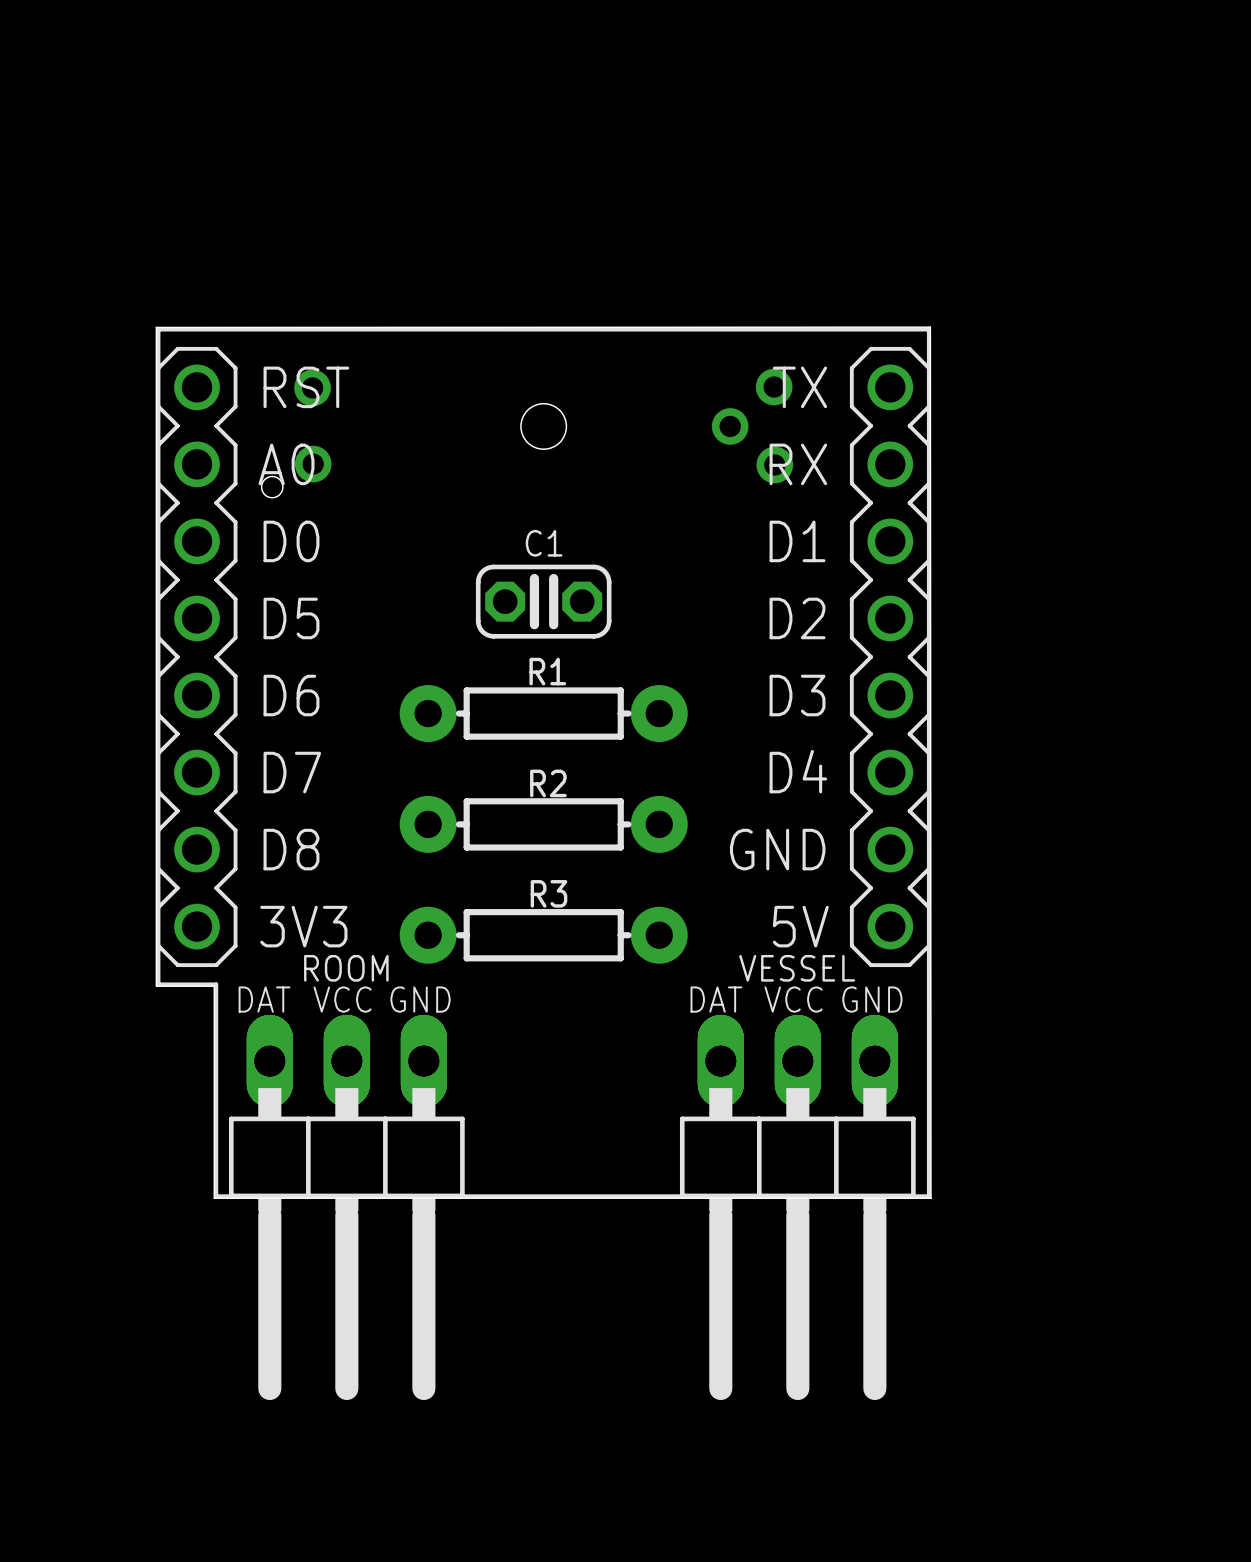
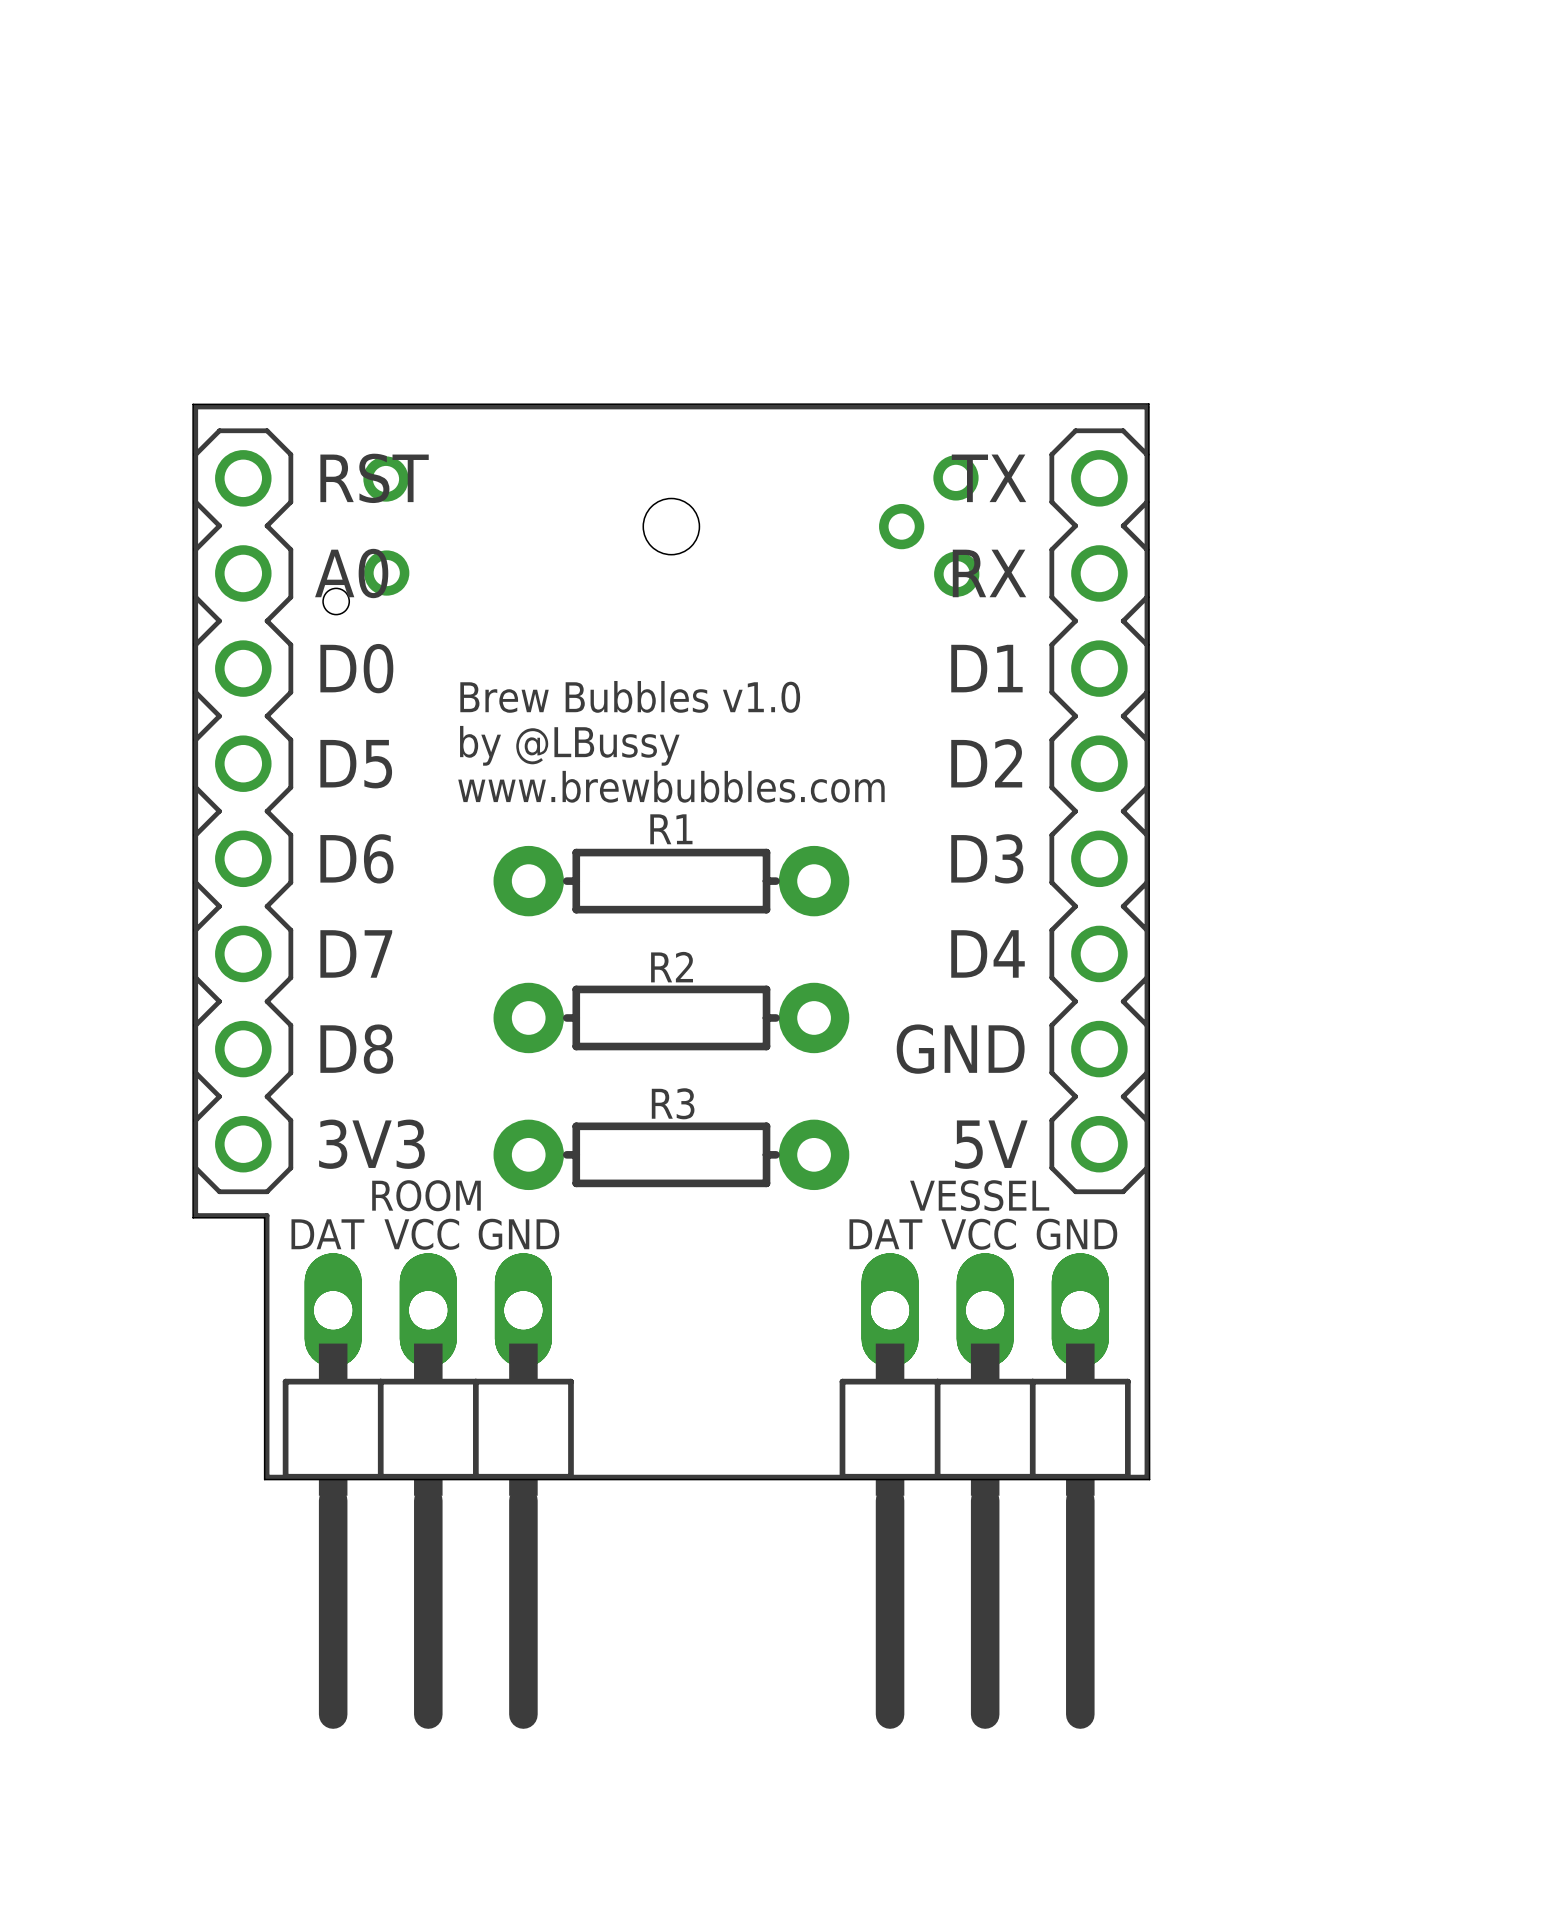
text: none -> Brew Bubbles v1.0 (630, 696)
C1: (543, 601) -> none
text: none -> by @LBussy (569, 745)
text: none -> www.brewbubbles.com (671, 786)

